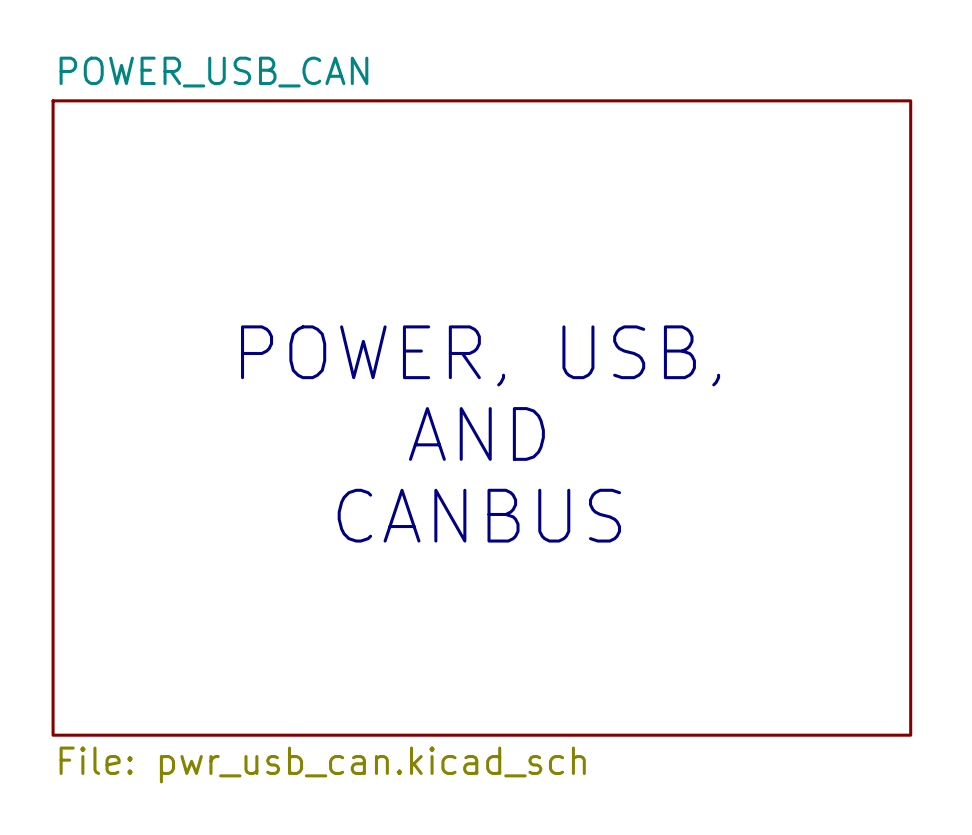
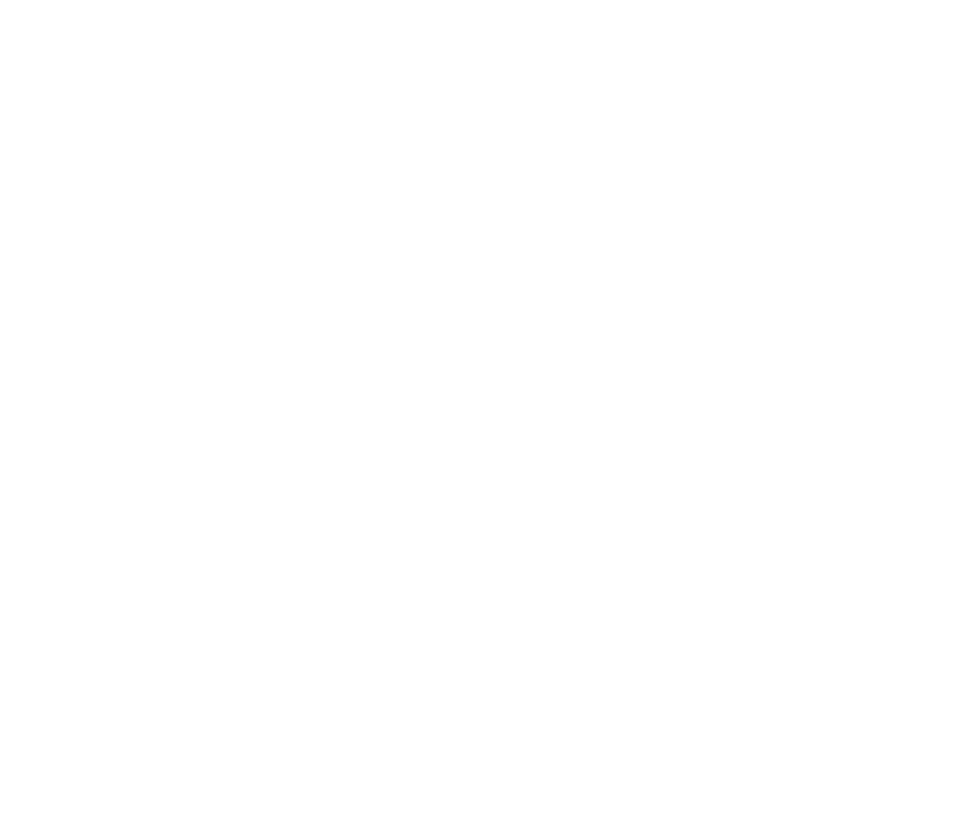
text: POWER, USB, (480, 355) -> none
sheet POWER_USB_CAN: File: pwr_usb_can.kicad_sch (481, 418) -> none
text: AND (476, 433) -> none
text: CANBUS (479, 515) -> none

